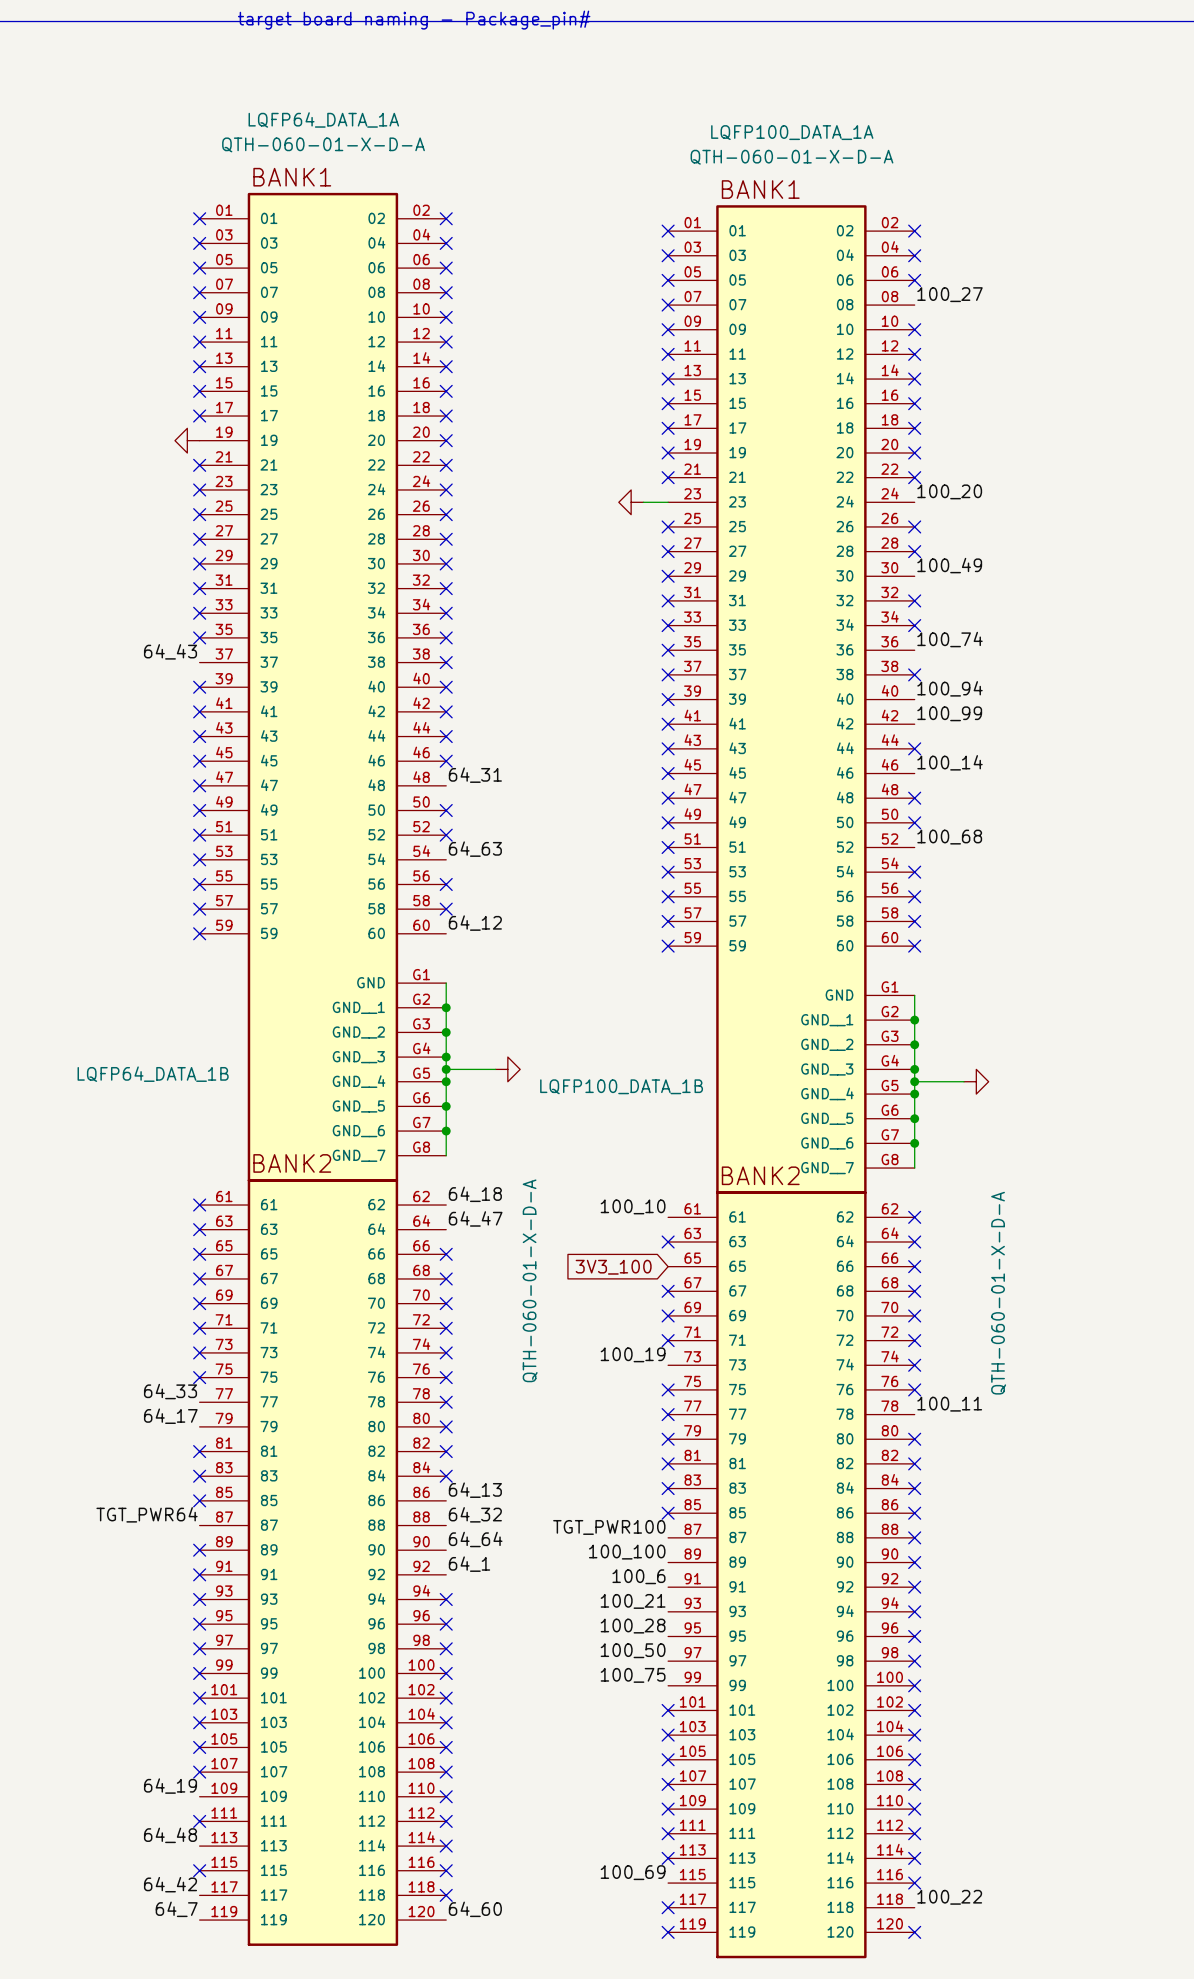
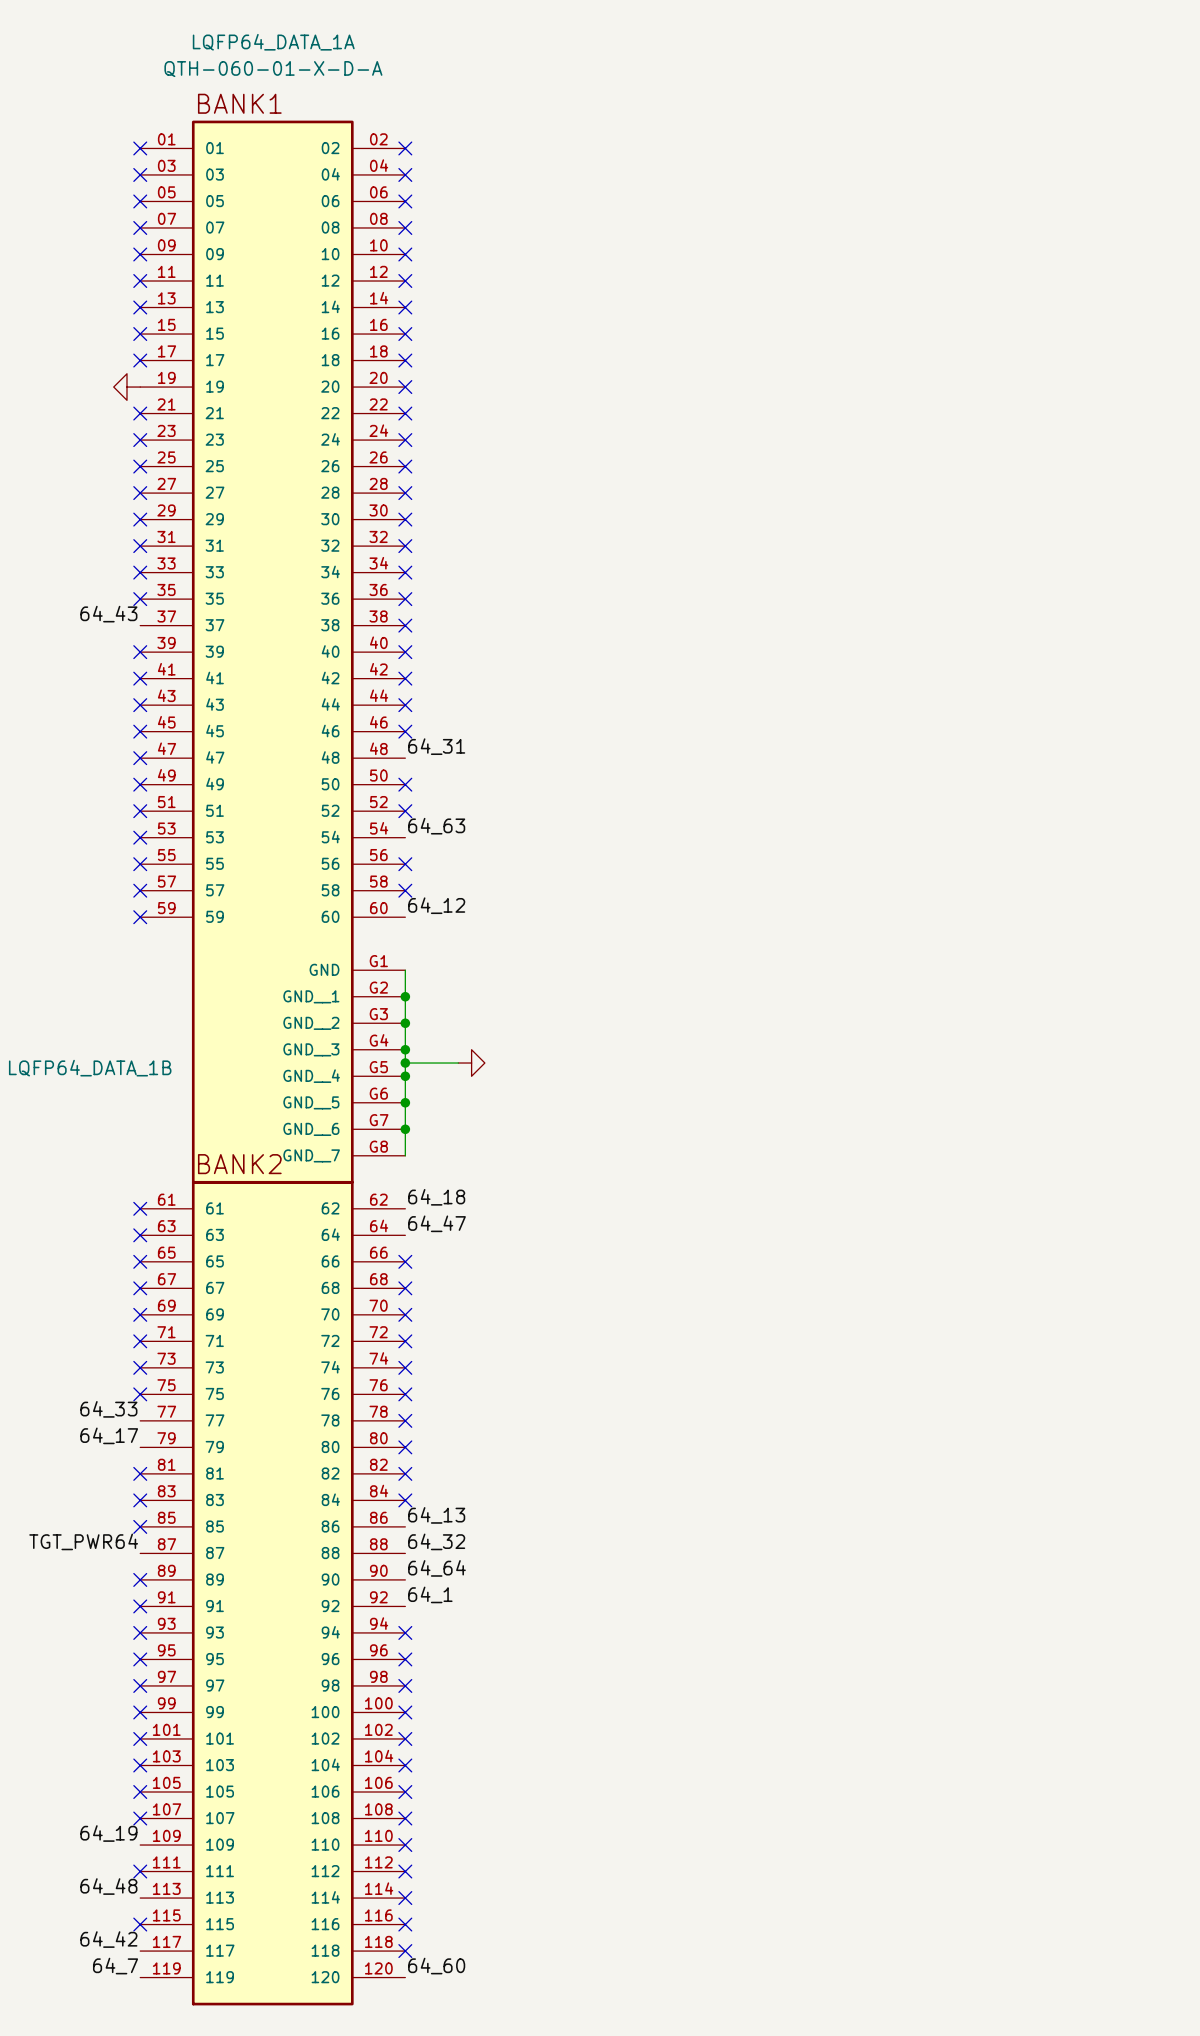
no-connect mark: (668, 231) -> none
no-connect mark: (914, 231) -> none
no-connect mark: (668, 255) -> none
no-connect mark: (914, 255) -> none
no-connect mark: (668, 280) -> none
no-connect mark: (914, 280) -> none
label: 100_27 (949, 294) -> none
no-connect mark: (668, 305) -> none
no-connect mark: (668, 329) -> none
no-connect mark: (914, 329) -> none
no-connect mark: (668, 354) -> none
no-connect mark: (914, 354) -> none
no-connect mark: (668, 379) -> none
no-connect mark: (914, 379) -> none
no-connect mark: (668, 403) -> none
no-connect mark: (914, 403) -> none
no-connect mark: (668, 428) -> none
no-connect mark: (914, 428) -> none
no-connect mark: (668, 453) -> none
no-connect mark: (914, 453) -> none
no-connect mark: (668, 477) -> none
no-connect mark: (914, 477) -> none
label: 100_20 (949, 491) -> none
power symbol: (631, 502) -> none
wire: (643, 502) (668, 502) -> none
no-connect mark: (668, 526) -> none
no-connect mark: (914, 526) -> none
no-connect mark: (668, 551) -> none
no-connect mark: (914, 551) -> none
label: 100_49 (949, 565) -> none
no-connect mark: (668, 576) -> none
no-connect mark: (668, 600) -> none
no-connect mark: (914, 600) -> none
no-connect mark: (668, 625) -> none
no-connect mark: (914, 625) -> none
label: 100_74 (949, 639) -> none
no-connect mark: (668, 650) -> none
no-connect mark: (668, 674) -> none
no-connect mark: (914, 674) -> none
label: 100_94 (949, 688) -> none
no-connect mark: (668, 699) -> none
LQFP100_DATA_1A: QTH-060-01-X-D-A (791, 699) -> none
label: 100_99 (949, 713) -> none
no-connect mark: (668, 724) -> none
no-connect mark: (668, 748) -> none
no-connect mark: (914, 748) -> none
label: 100_14 (949, 762) -> none
no-connect mark: (668, 773) -> none
no-connect mark: (668, 798) -> none
no-connect mark: (914, 798) -> none
no-connect mark: (668, 822) -> none
no-connect mark: (914, 822) -> none
label: 100_68 (949, 837) -> none
no-connect mark: (668, 847) -> none
no-connect mark: (668, 872) -> none
no-connect mark: (914, 872) -> none
no-connect mark: (668, 896) -> none
no-connect mark: (914, 896) -> none
no-connect mark: (668, 921) -> none
no-connect mark: (914, 921) -> none
no-connect mark: (668, 946) -> none
no-connect mark: (914, 946) -> none
wire: (914, 995) (914, 1168) -> none
junction: (914, 1020) -> none
junction: (914, 1044) -> none
junction: (914, 1069) -> none
wire: (914, 1081) (963, 1081) -> none
junction: (914, 1081) -> none
power symbol: (976, 1081) -> none
junction: (914, 1094) -> none
junction: (914, 1118) -> none
junction: (914, 1143) -> none
label: 100_10 (633, 1206) -> none
no-connect mark: (914, 1217) -> none
no-connect mark: (668, 1241) -> none
no-connect mark: (914, 1241) -> none
no-connect mark: (914, 1266) -> none
global label: 3V3_100 (613, 1267) -> none
LQFP64_DATA_1B value: QTH-060-01-X-D-A (530, 1280) -> none
no-connect mark: (668, 1291) -> none
no-connect mark: (914, 1291) -> none
no-connect mark: (668, 1315) -> none
no-connect mark: (914, 1315) -> none
no-connect mark: (668, 1340) -> none
no-connect mark: (914, 1340) -> none
label: 100_19 (633, 1354) -> none
no-connect mark: (914, 1365) -> none
no-connect mark: (668, 1389) -> none
no-connect mark: (914, 1389) -> none
label: 100_11 (949, 1404) -> none
no-connect mark: (668, 1414) -> none
no-connect mark: (668, 1439) -> none
no-connect mark: (914, 1439) -> none
no-connect mark: (668, 1463) -> none
no-connect mark: (914, 1463) -> none
no-connect mark: (668, 1488) -> none
no-connect mark: (914, 1488) -> none
no-connect mark: (668, 1513) -> none
no-connect mark: (914, 1513) -> none
label: TGT_PWR100 (609, 1527) -> none
no-connect mark: (914, 1537) -> none
label: 100_100 (627, 1552) -> none
no-connect mark: (914, 1562) -> none
LQFP100_DATA_1B: QTH-060-01-X-D-A (791, 1574) -> none
label: 100_6 (638, 1576) -> none
no-connect mark: (914, 1587) -> none
label: 100_21 (633, 1601) -> none
no-connect mark: (914, 1611) -> none
label: 100_28 (633, 1626) -> none
no-connect mark: (914, 1636) -> none
label: 100_50 (633, 1650) -> none
no-connect mark: (914, 1661) -> none
label: 100_75 (633, 1675) -> none
no-connect mark: (914, 1685) -> none
no-connect mark: (668, 1710) -> none
no-connect mark: (914, 1710) -> none
no-connect mark: (668, 1735) -> none
no-connect mark: (914, 1735) -> none
no-connect mark: (668, 1759) -> none
no-connect mark: (914, 1759) -> none
no-connect mark: (668, 1784) -> none
no-connect mark: (914, 1784) -> none
no-connect mark: (668, 1809) -> none
no-connect mark: (914, 1809) -> none
no-connect mark: (668, 1833) -> none
no-connect mark: (914, 1833) -> none
no-connect mark: (668, 1858) -> none
no-connect mark: (914, 1858) -> none
label: 100_69 (633, 1872) -> none
no-connect mark: (914, 1883) -> none
label: 100_22 (949, 1897) -> none
no-connect mark: (668, 1907) -> none
no-connect mark: (668, 1932) -> none
no-connect mark: (914, 1932) -> none

